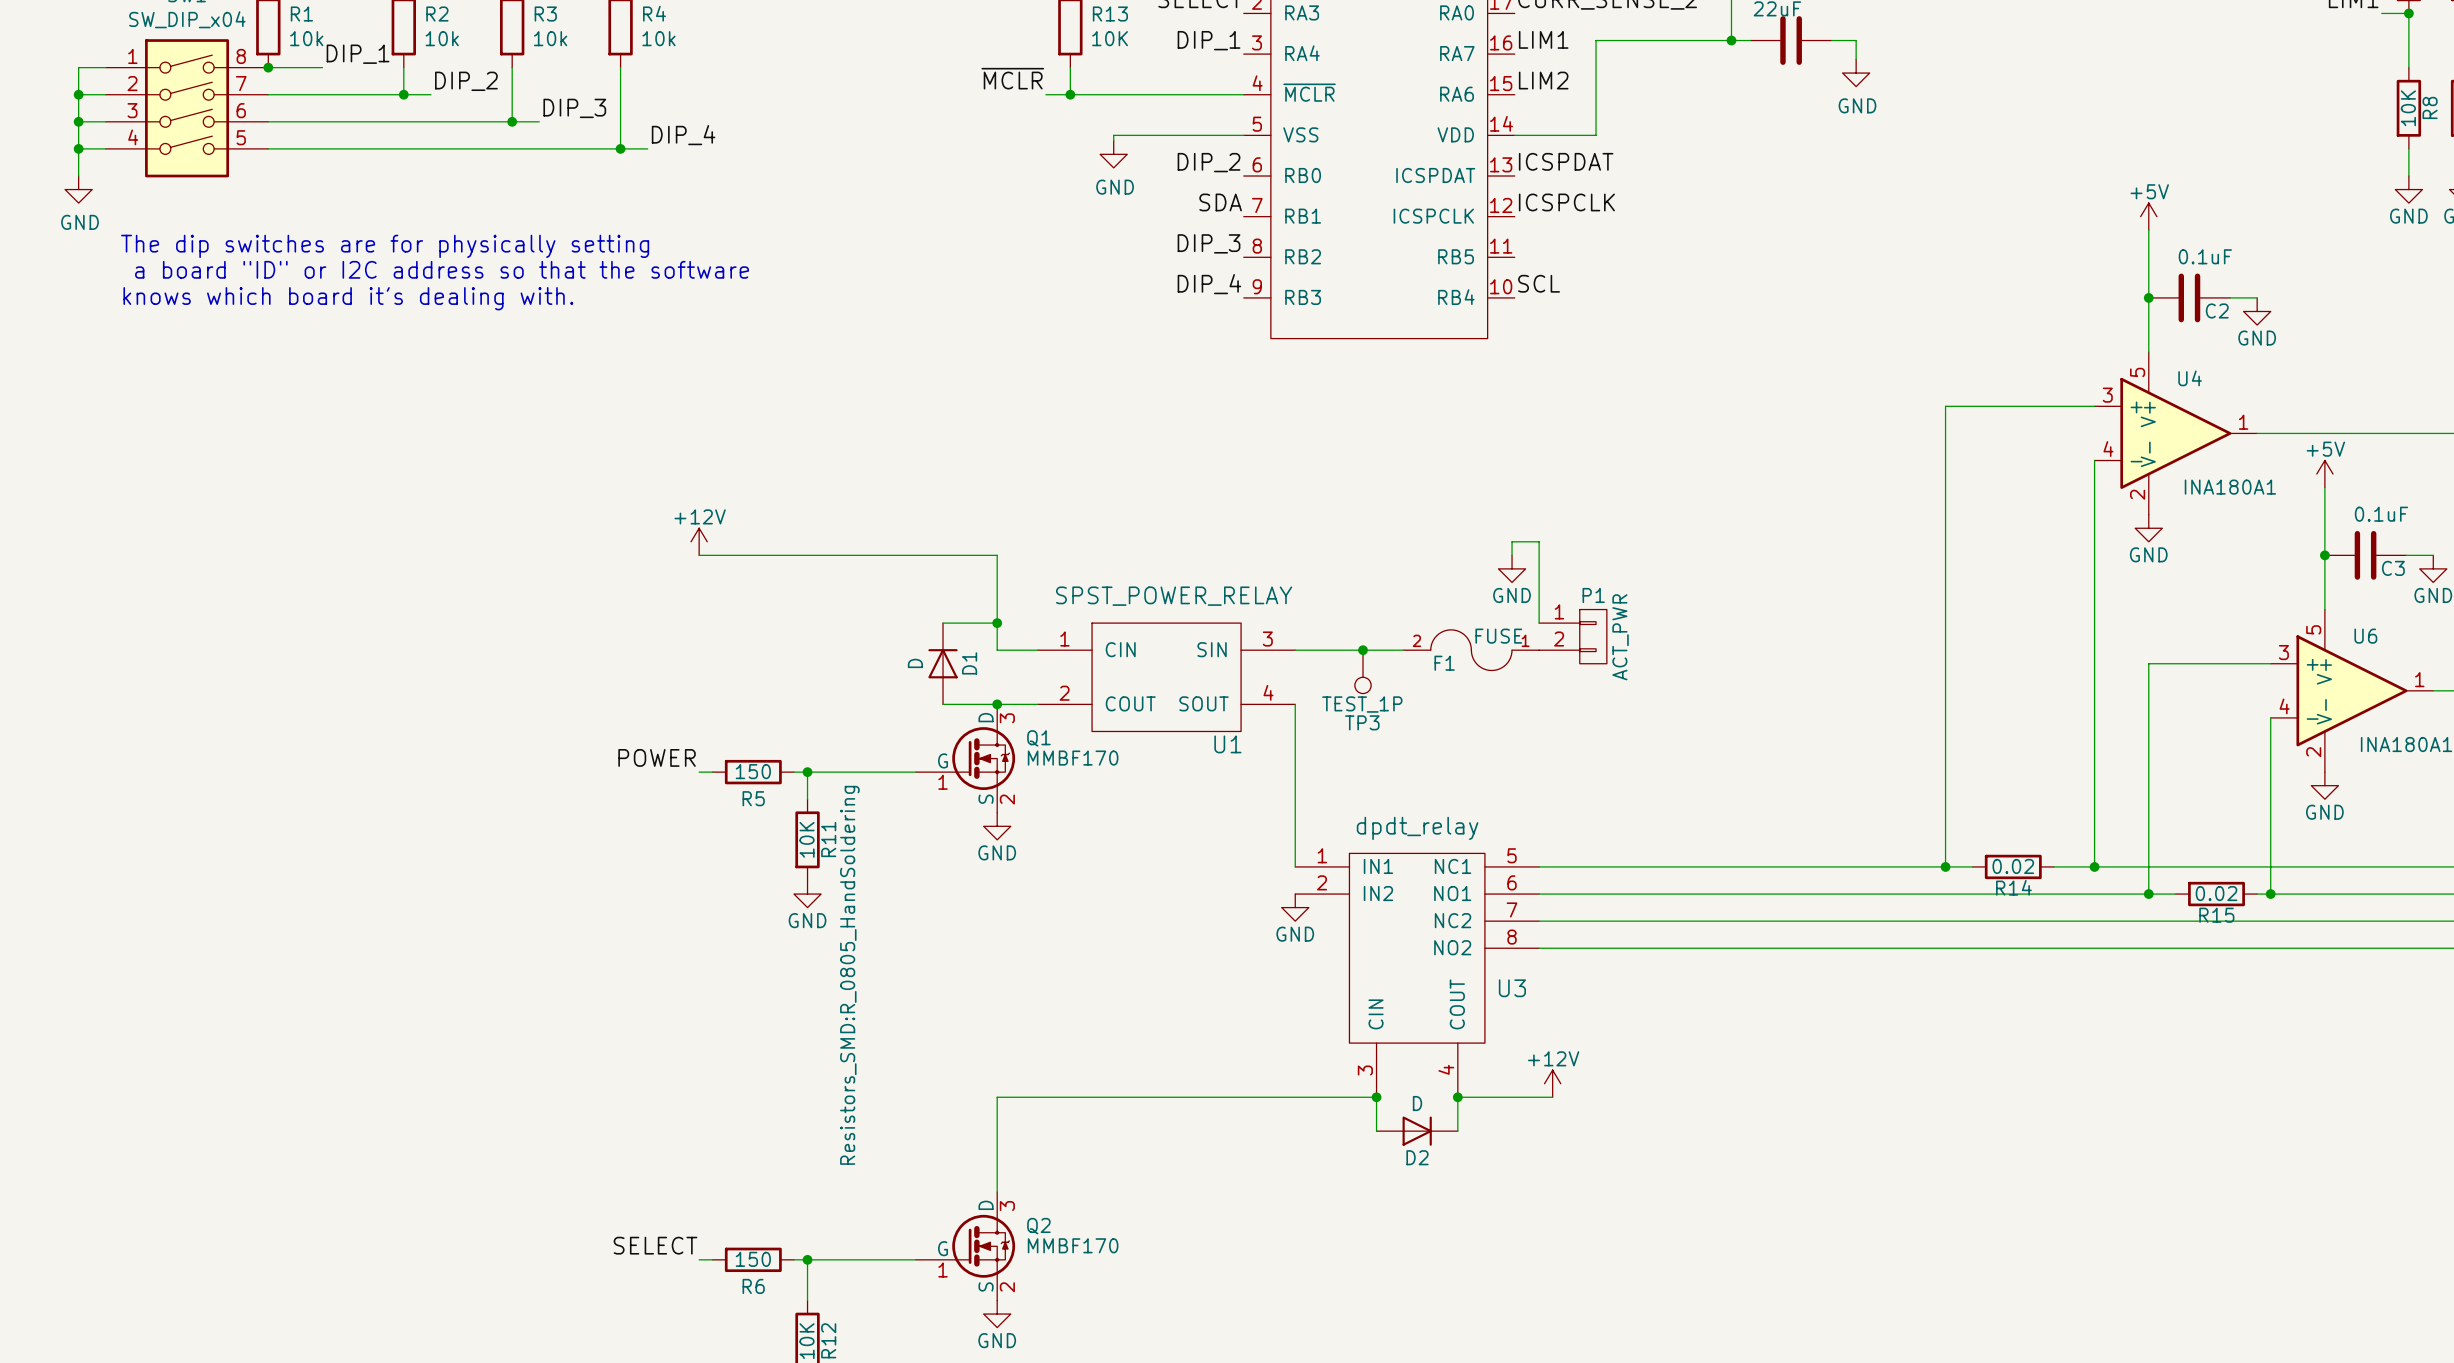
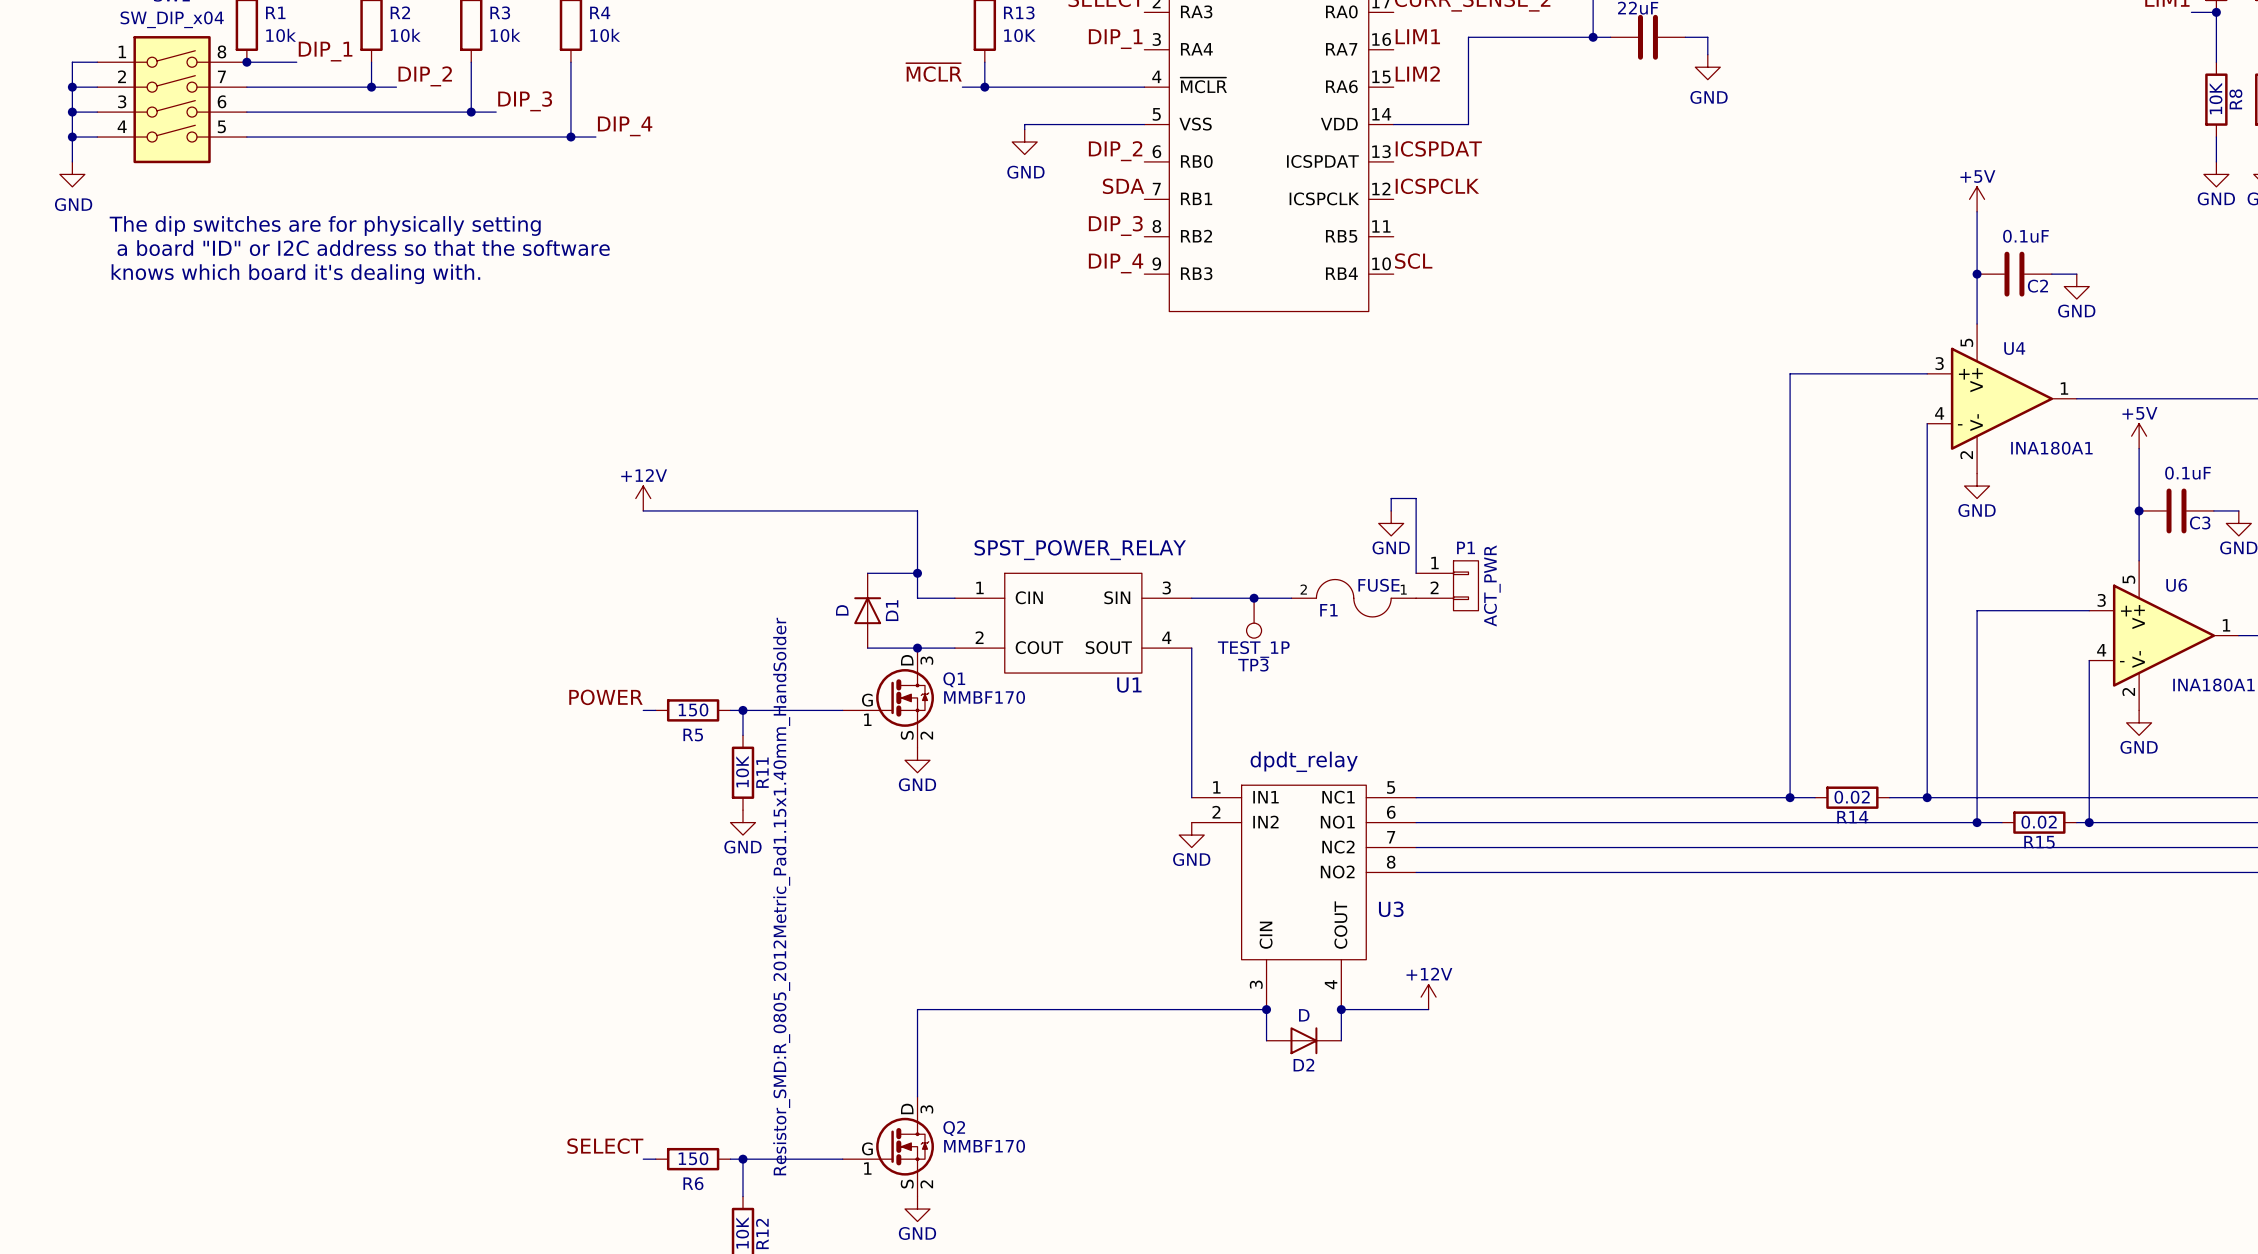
R11 text: Resistors_SMD:R_0805_HandSoldering (849, 975) -> Resistor_SMD:R_0805_2012Metric_Pad1.15x1.40mm_HandSolder (781, 896)

